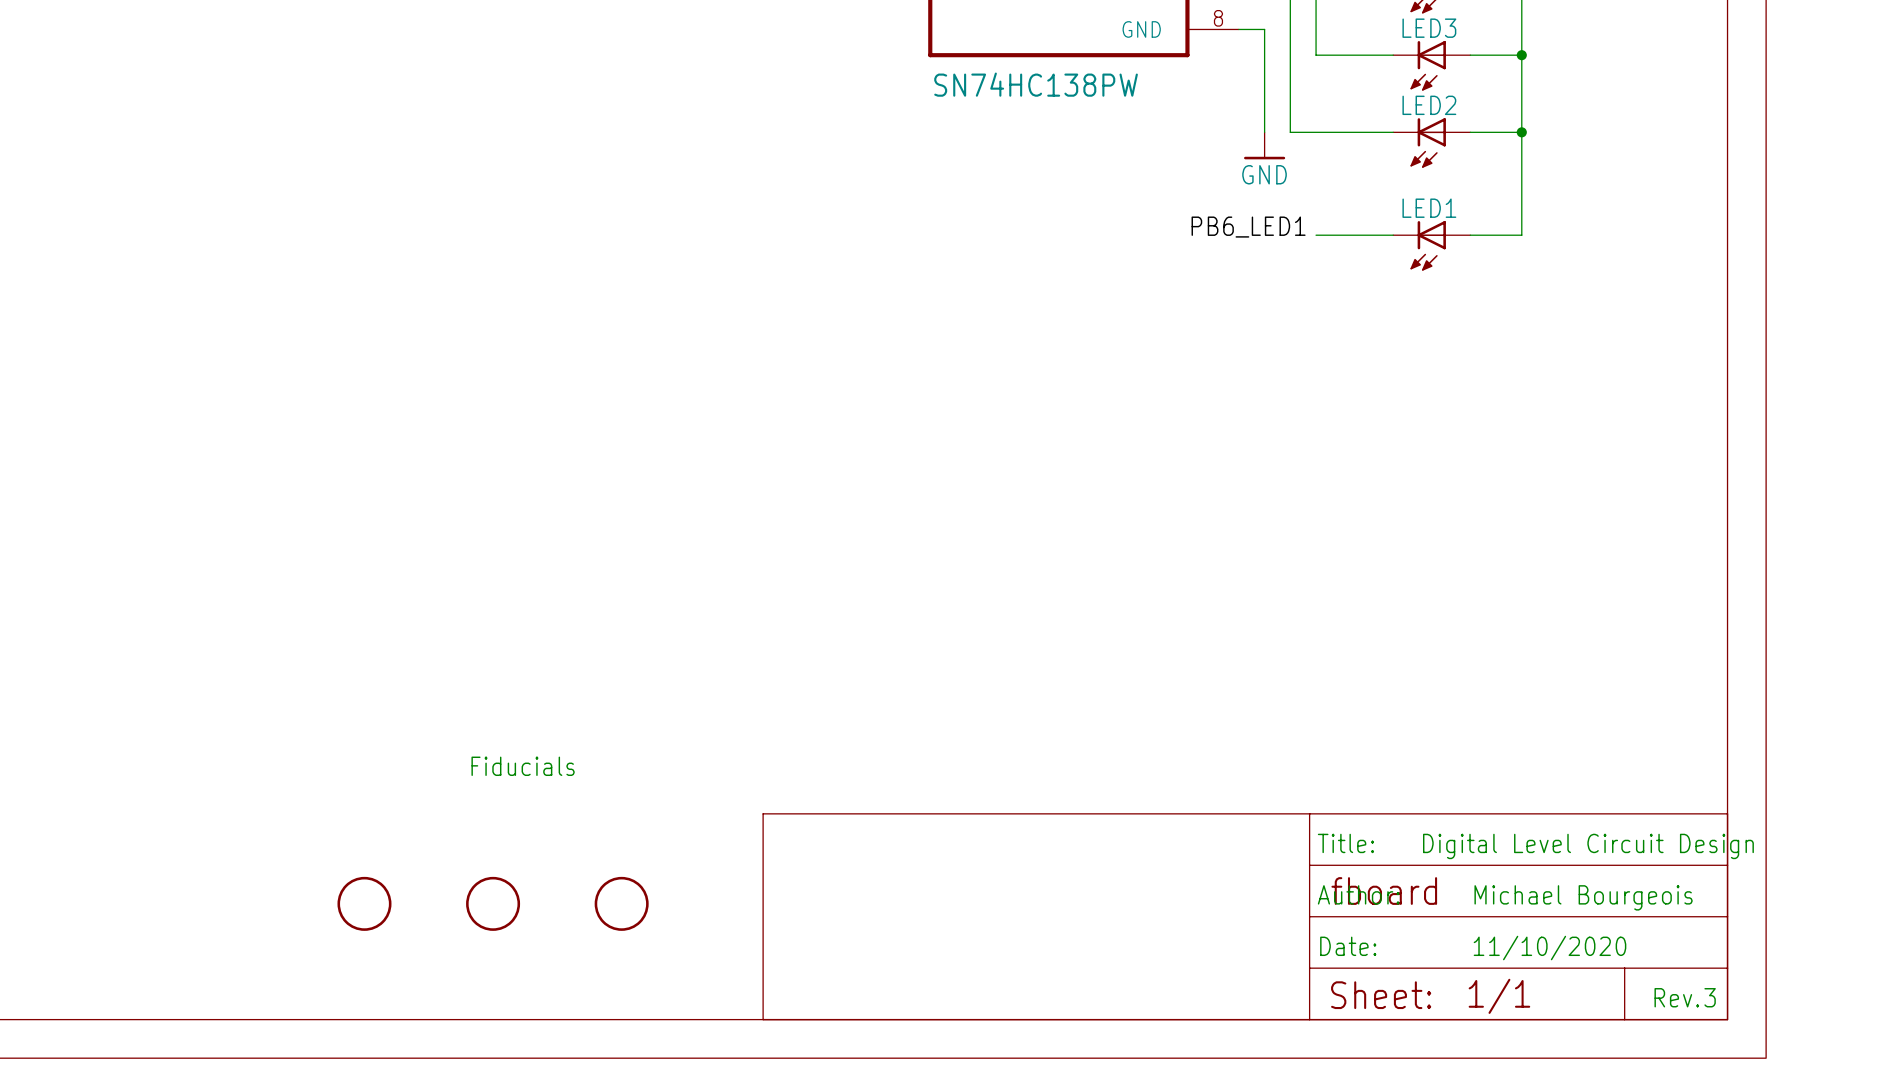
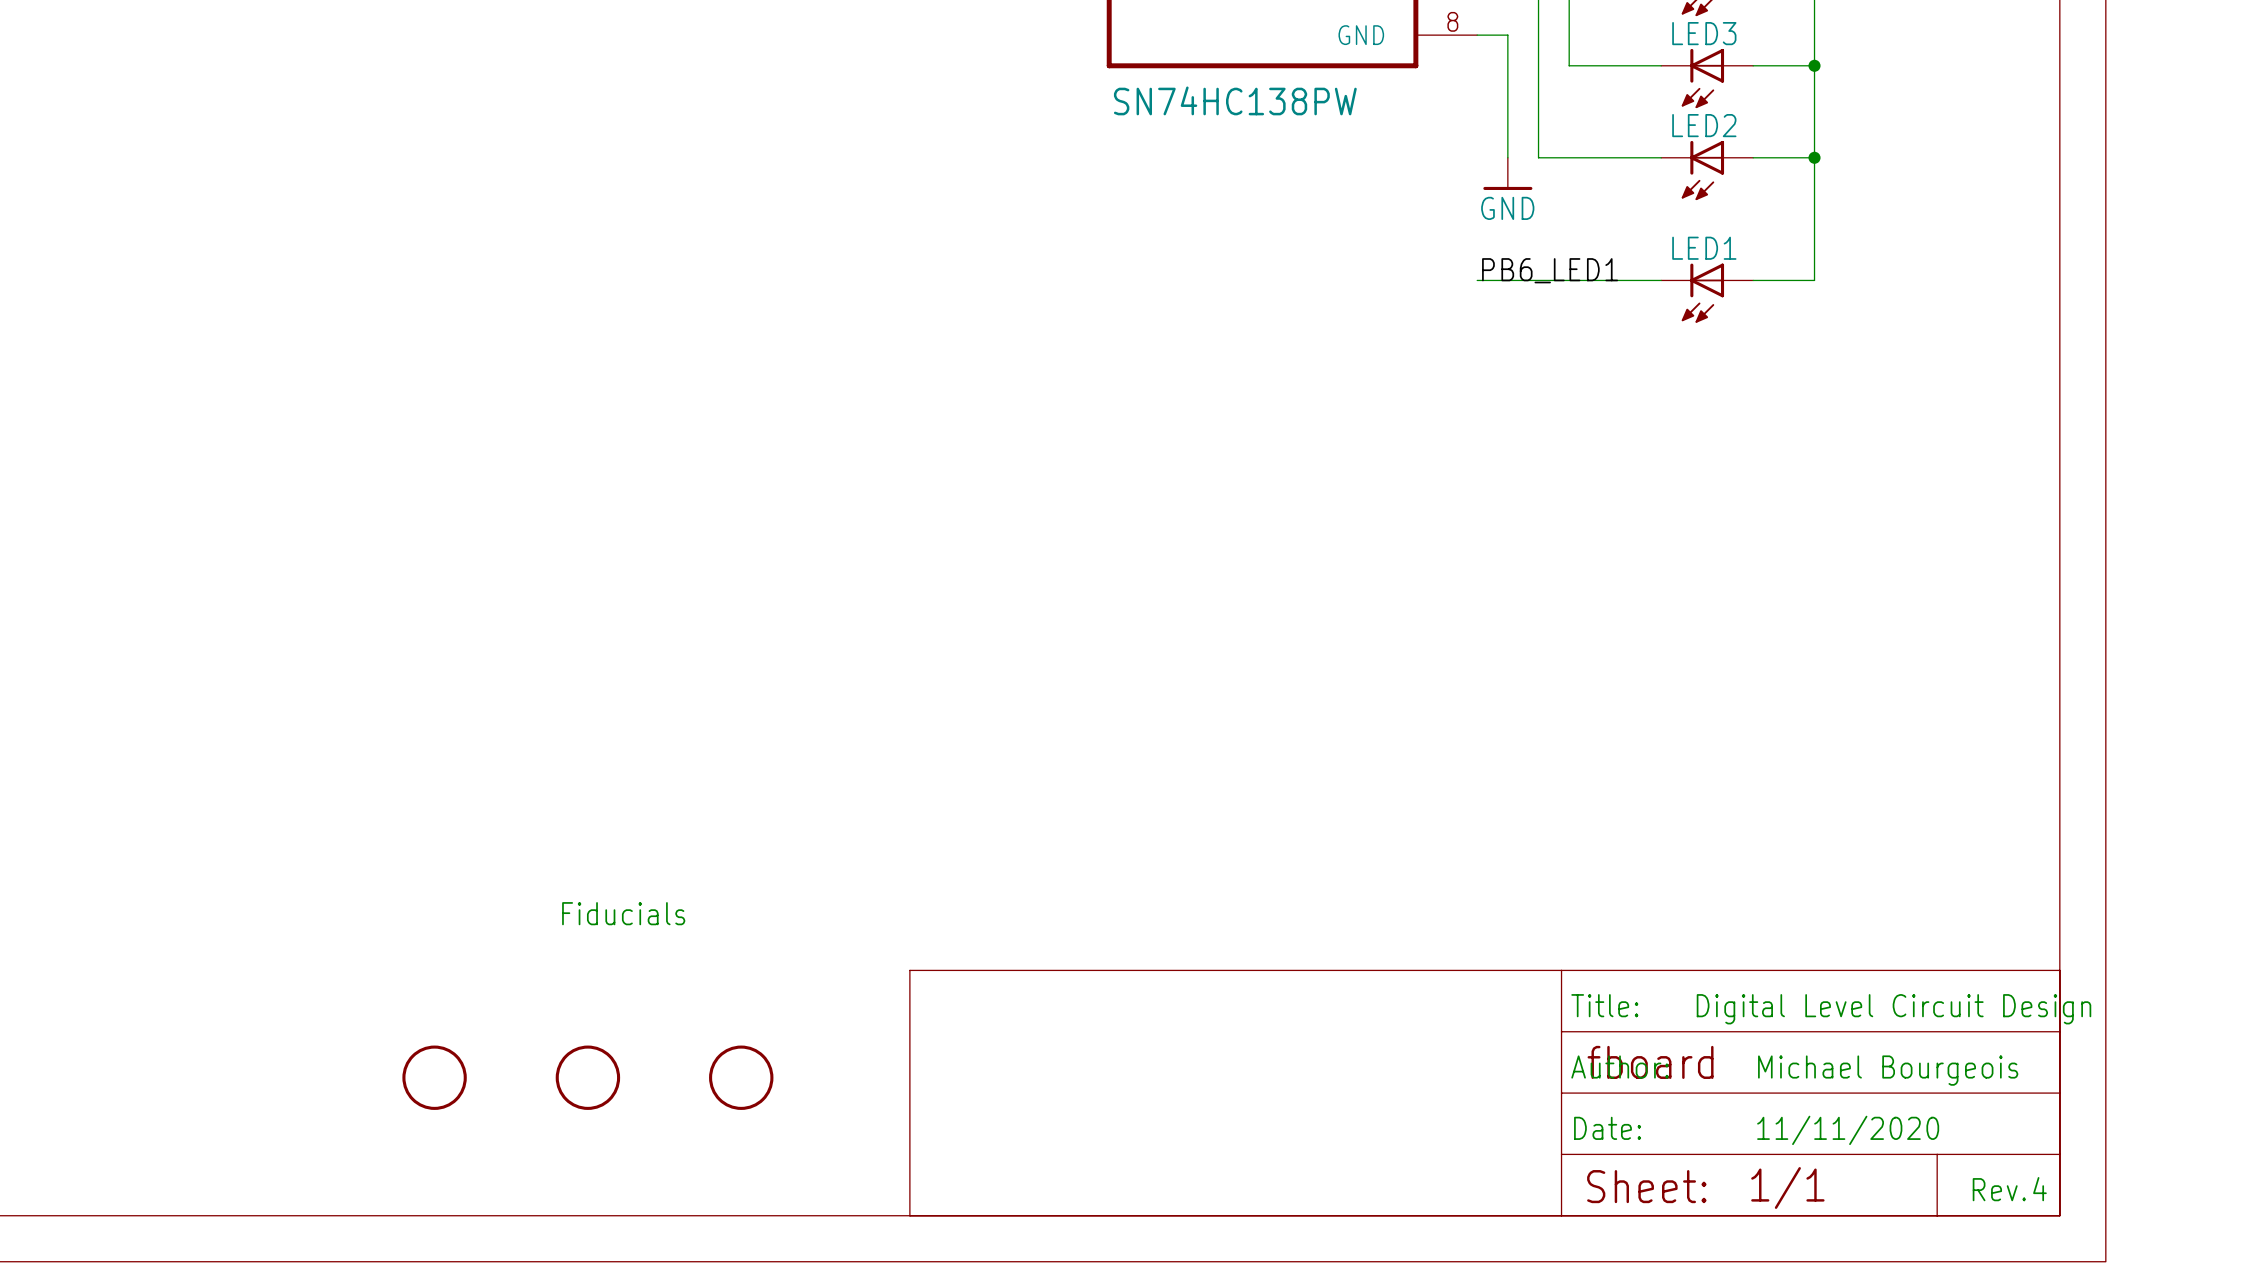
label position: PB6_LED1 (1248, 227) -> PB6_LED1 (1550, 270)
wire: none -> (1477, 280) (1569, 280)
text: 11/10/2020 (1549, 948) -> 11/11/2020 (1848, 1130)
text: 3 (1710, 997) -> 4 (2039, 1189)

